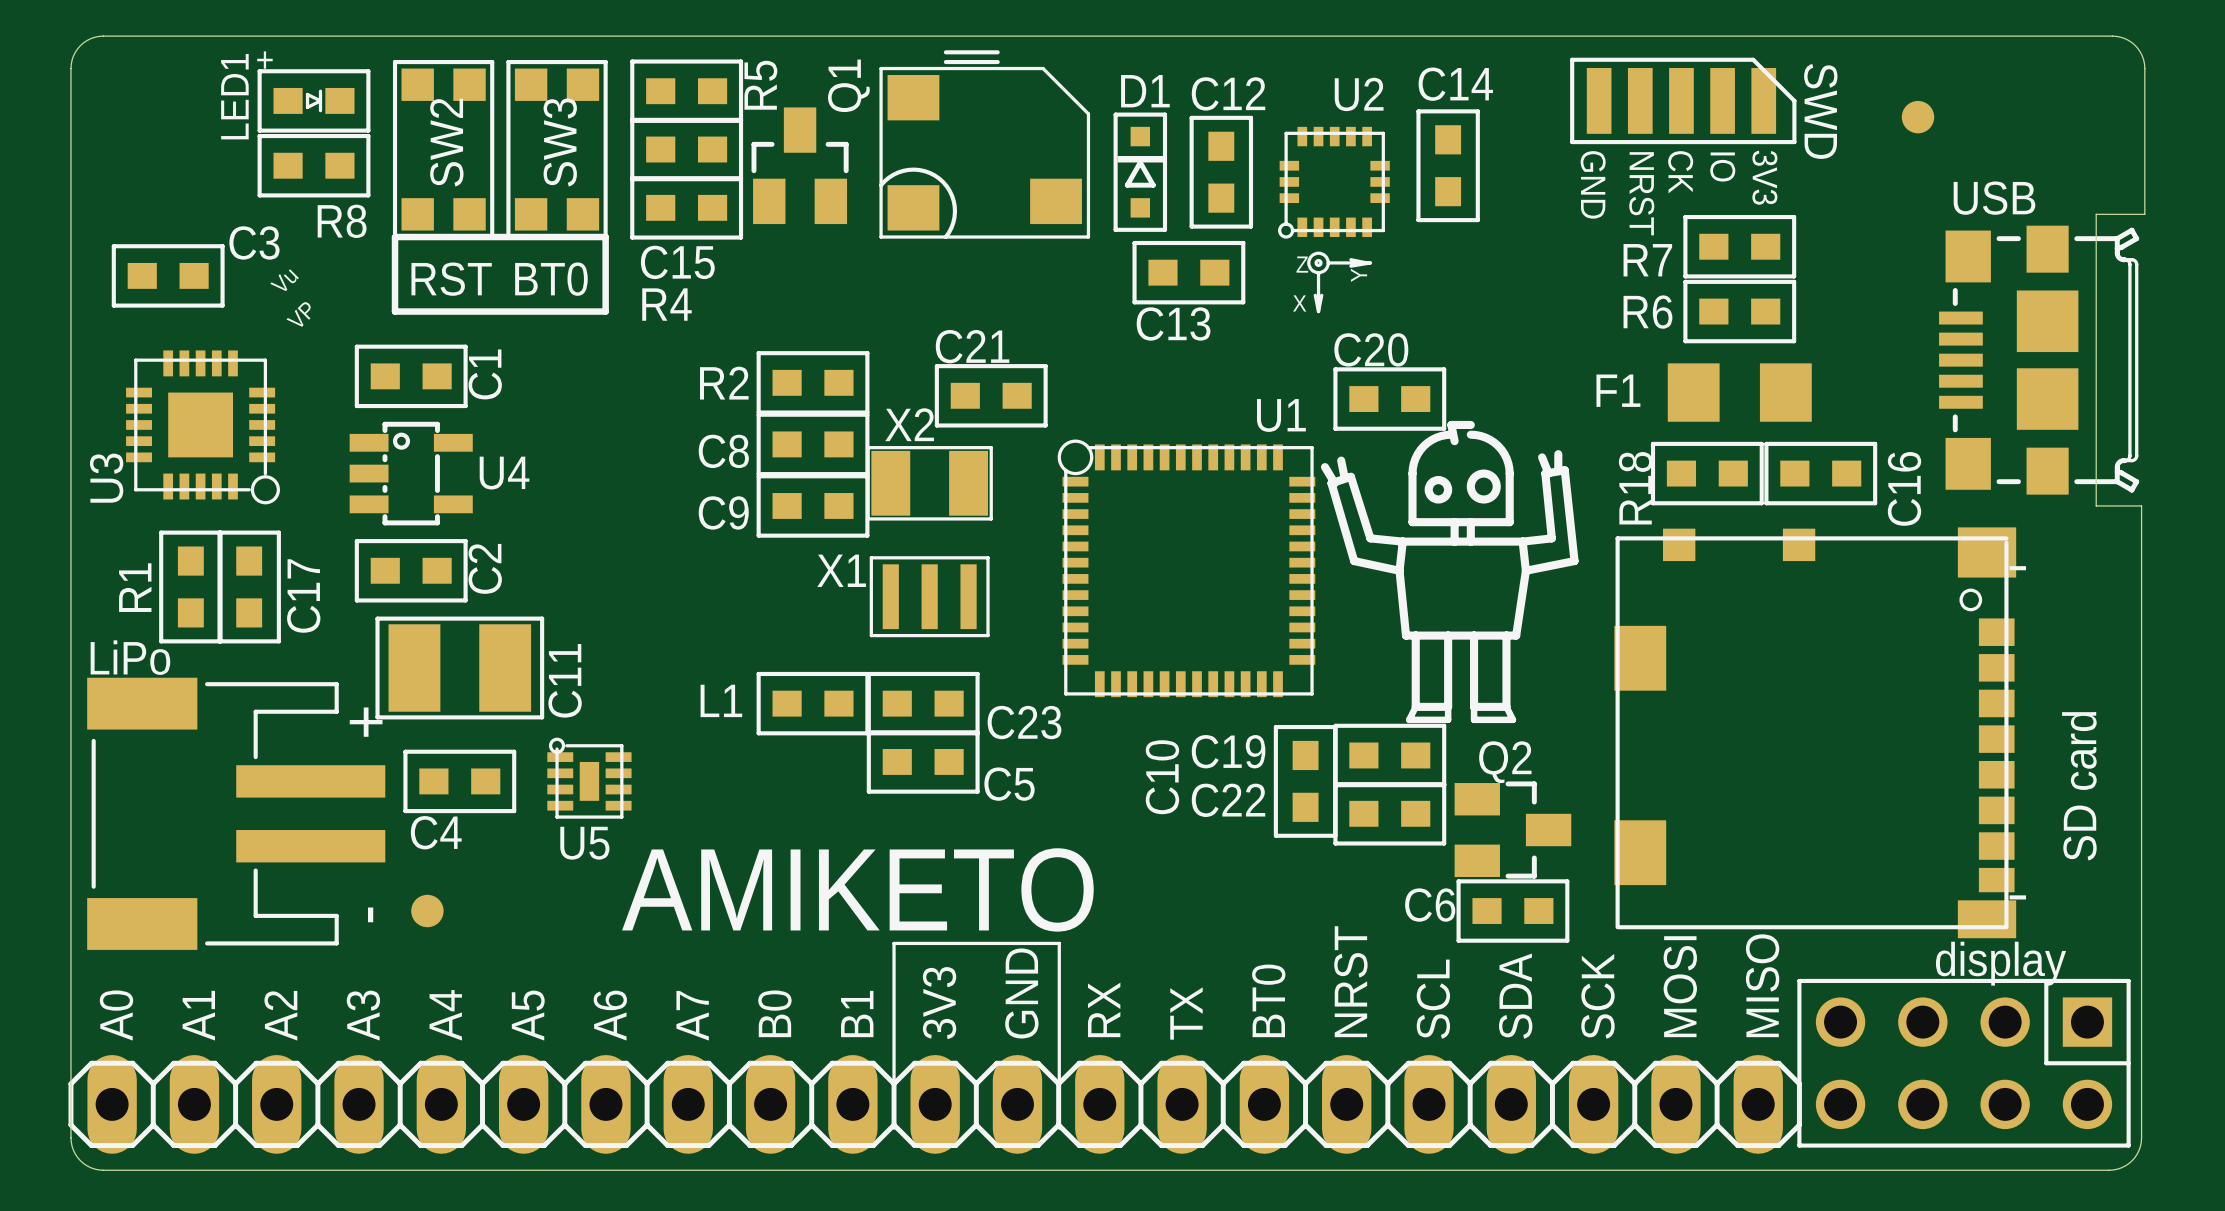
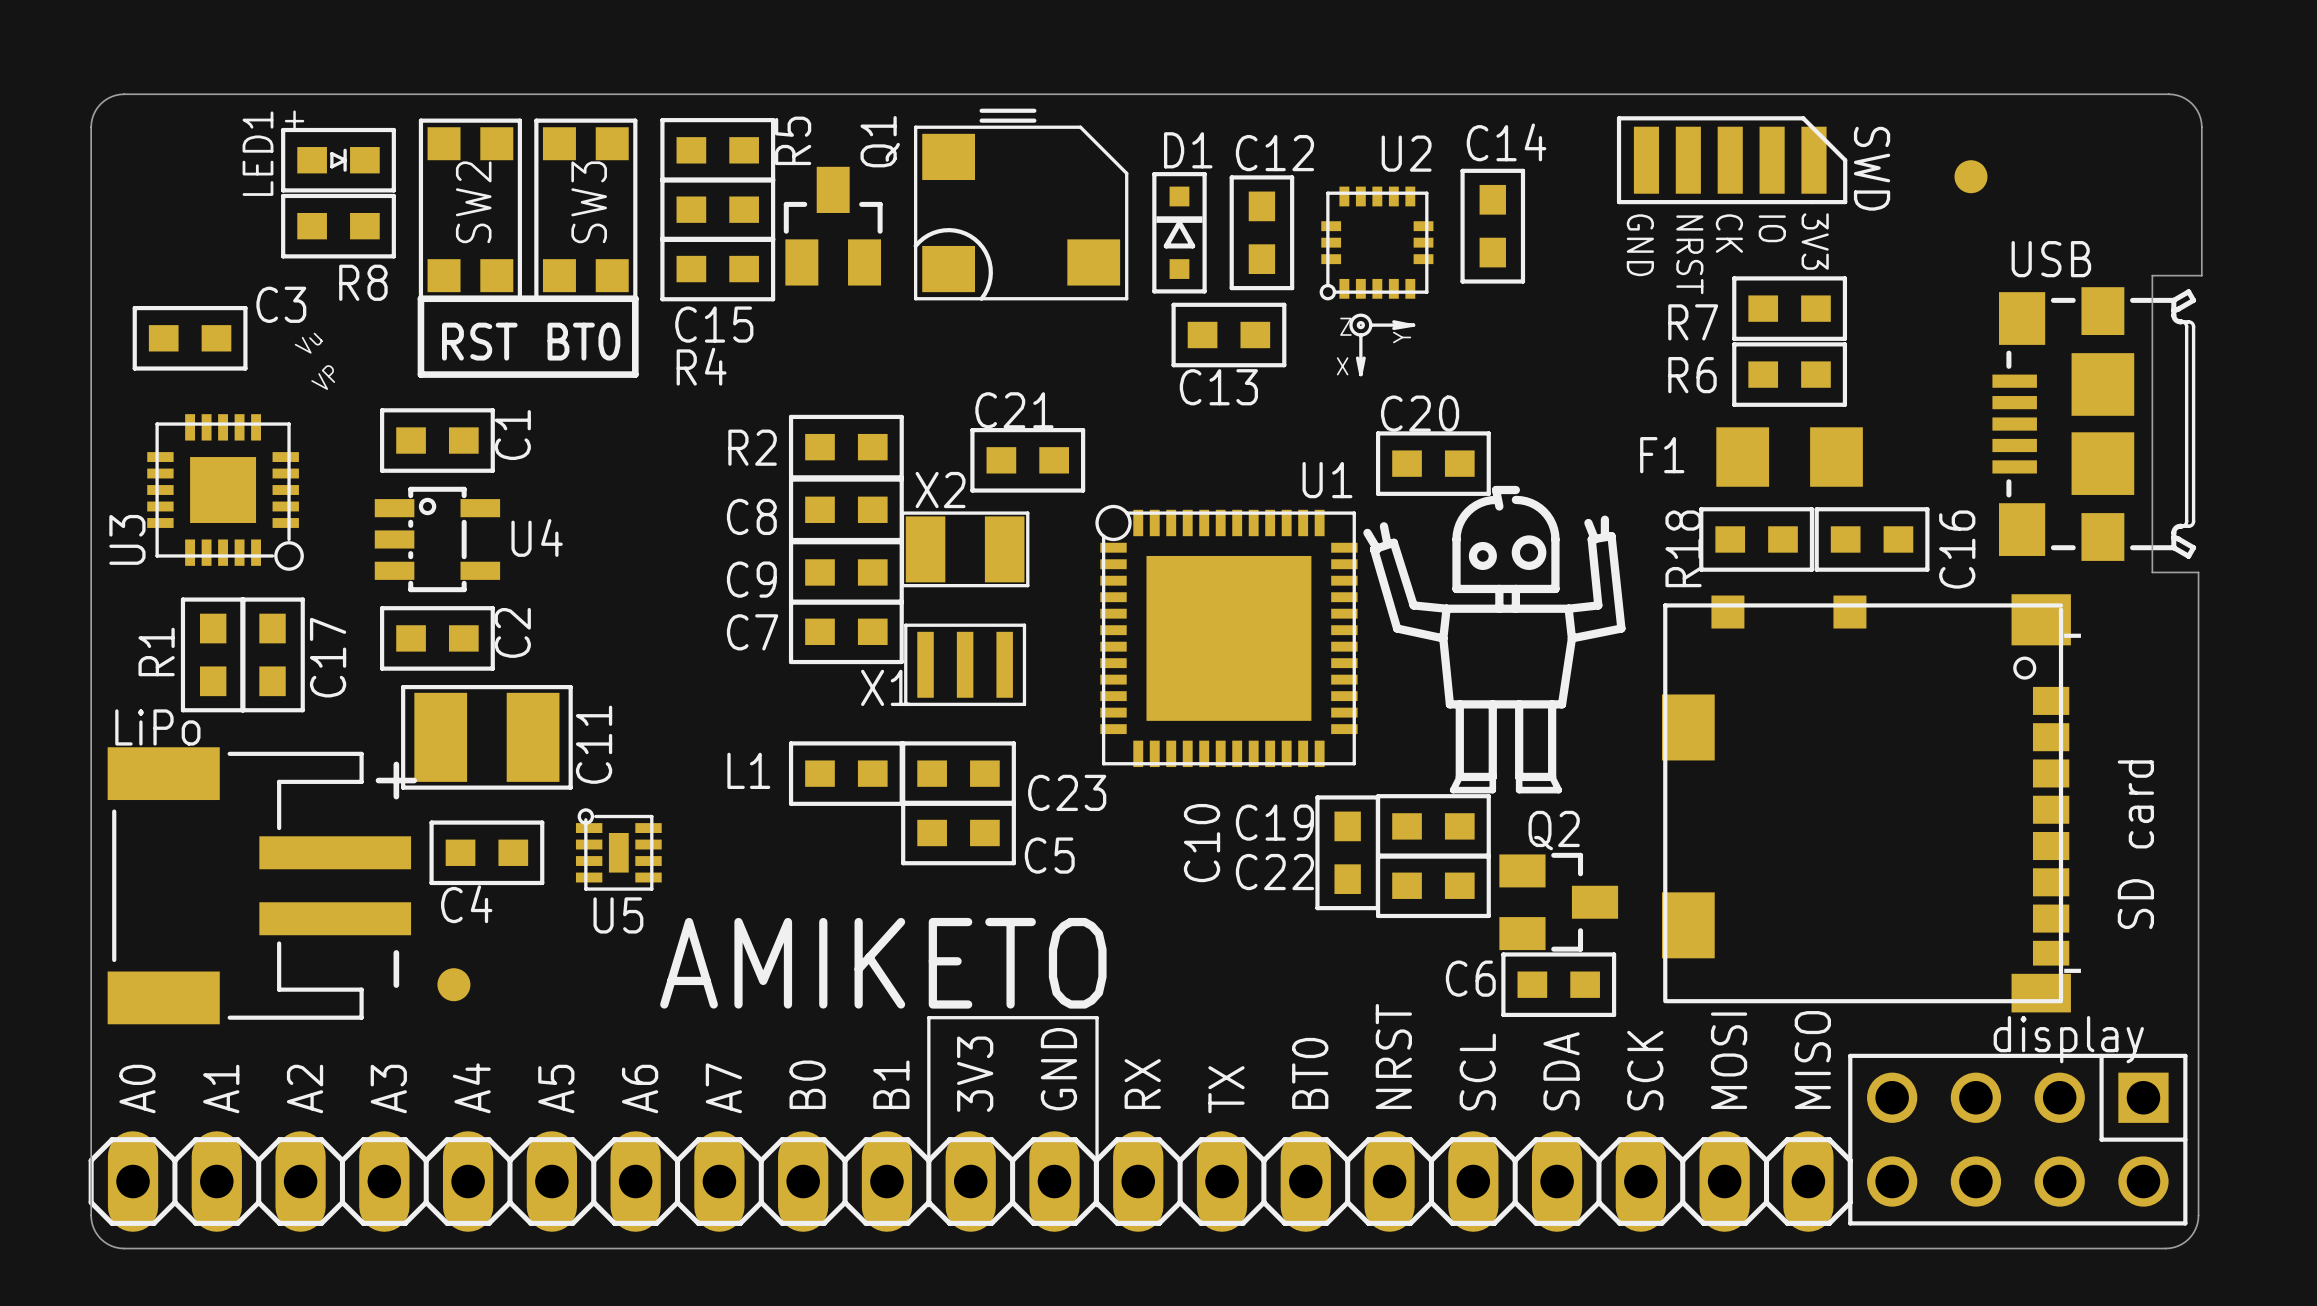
U1 footprint: [1057, 439, 1316, 698] -> [1095, 504, 1358, 768]
C7: none -> (846, 631)
X1 name position: X1 (841, 570) -> X1 (886, 687)

